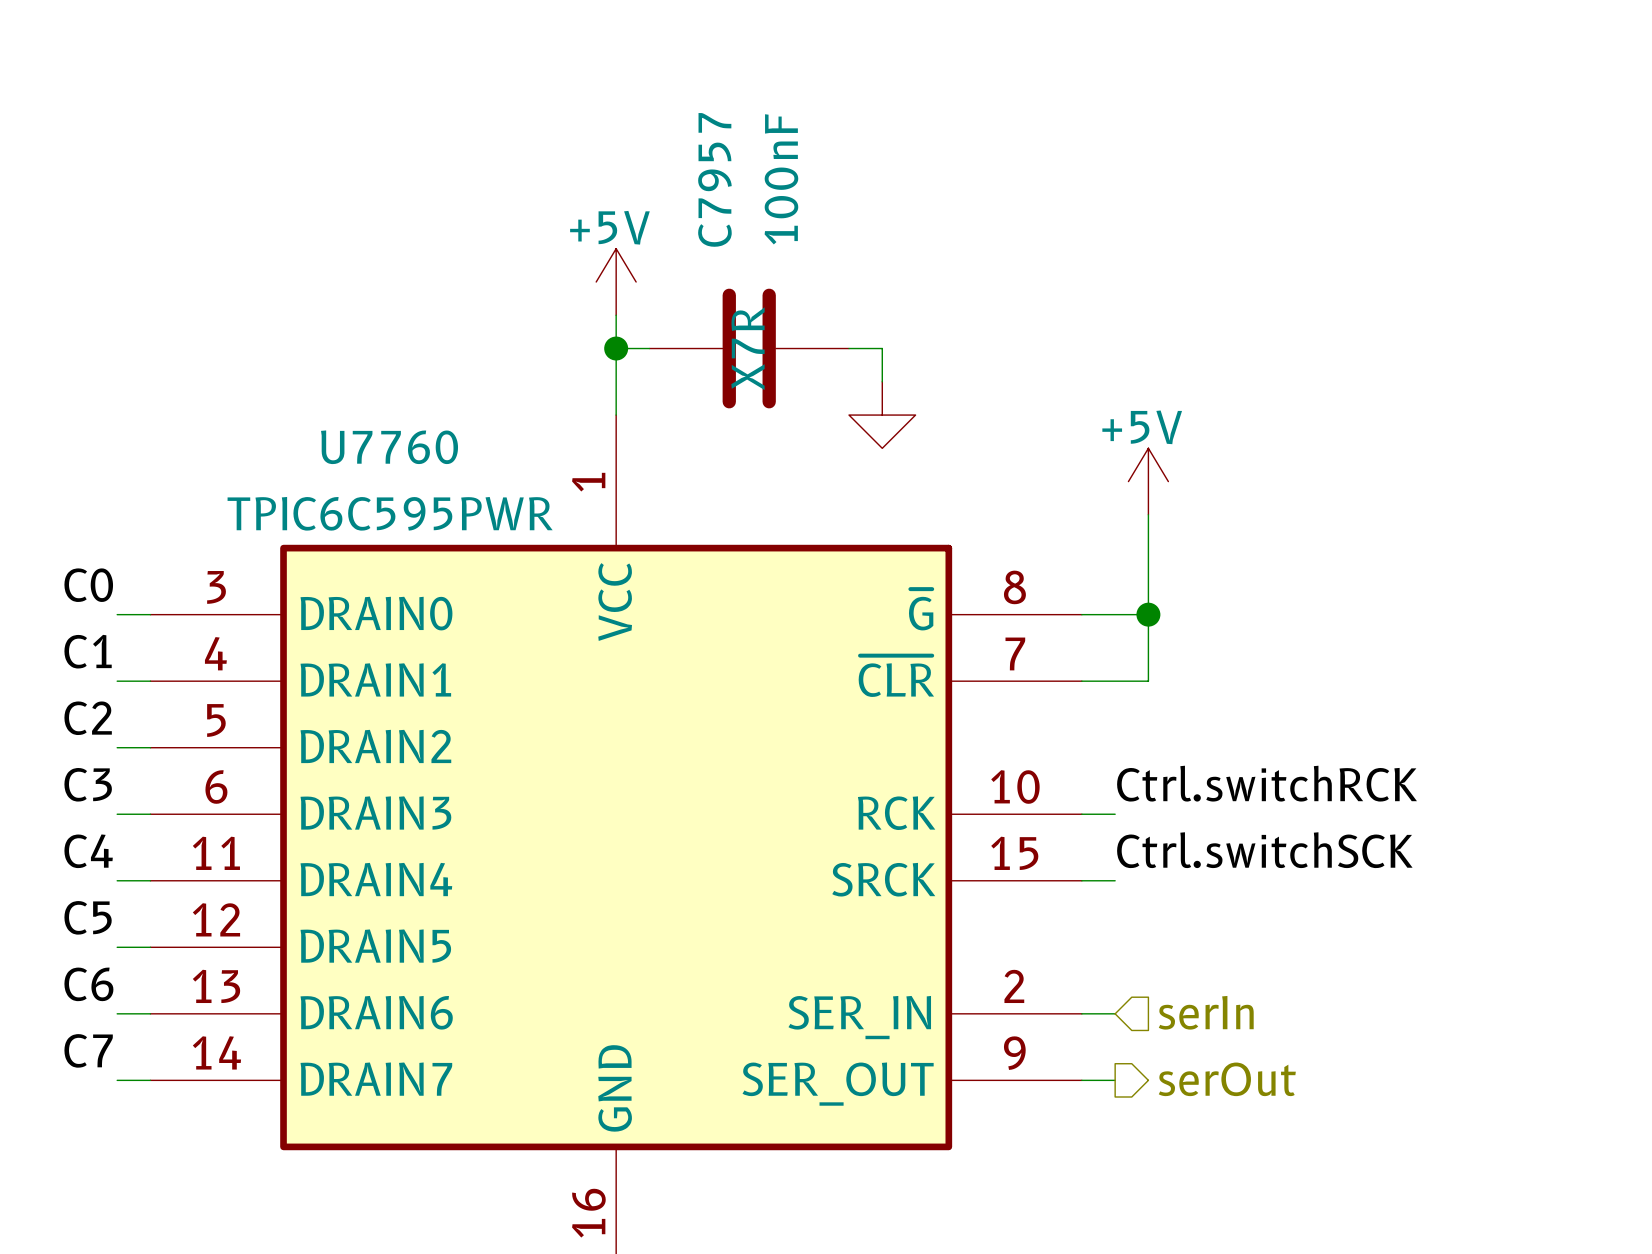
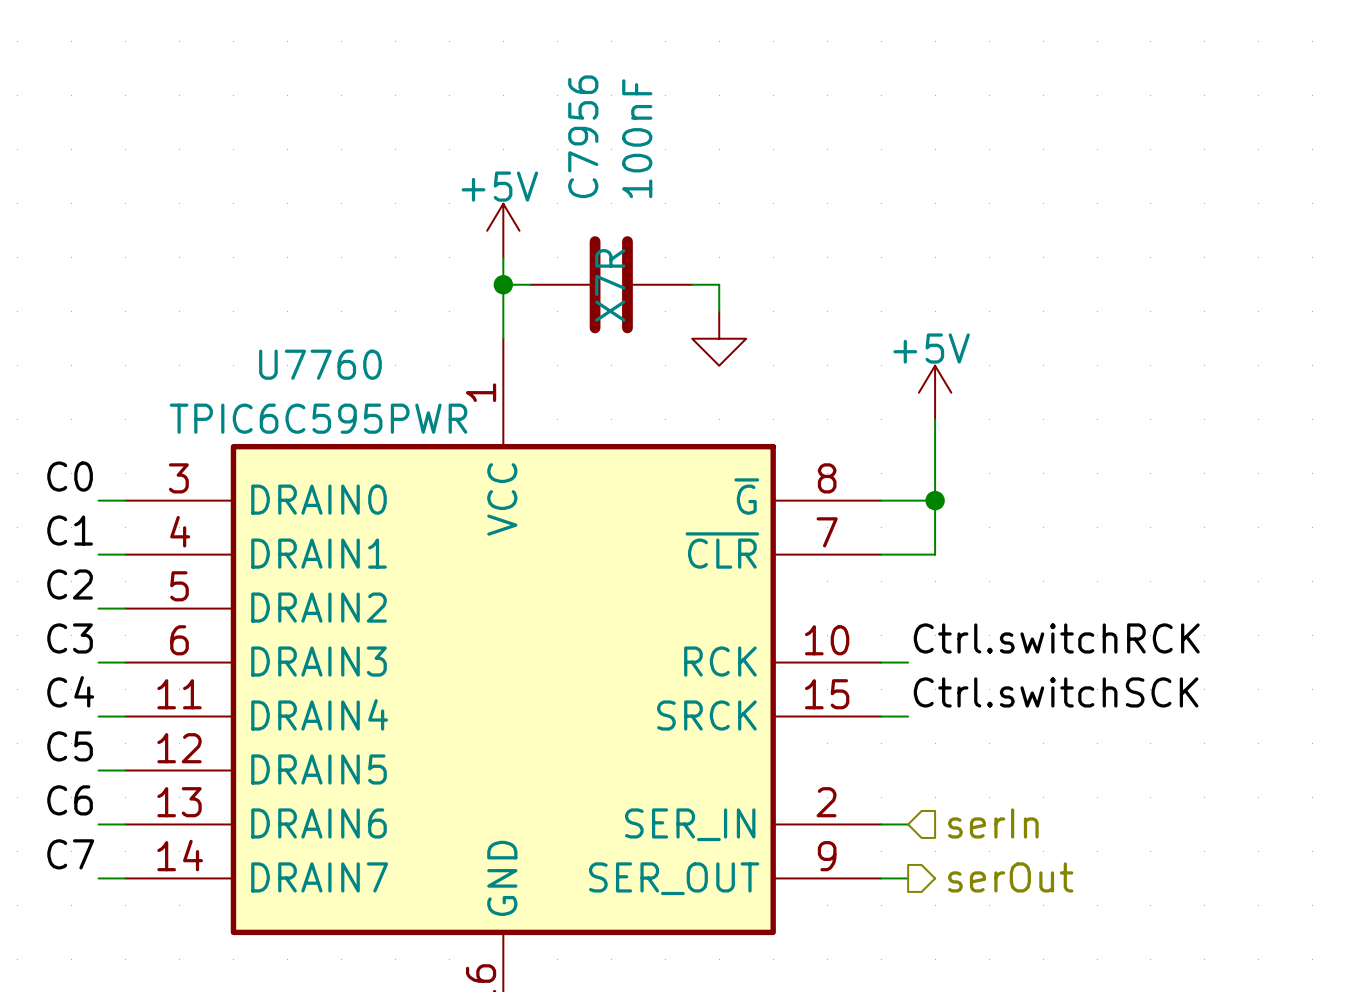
C7957 name: C7957 (714, 179) -> C7956 (583, 136)

